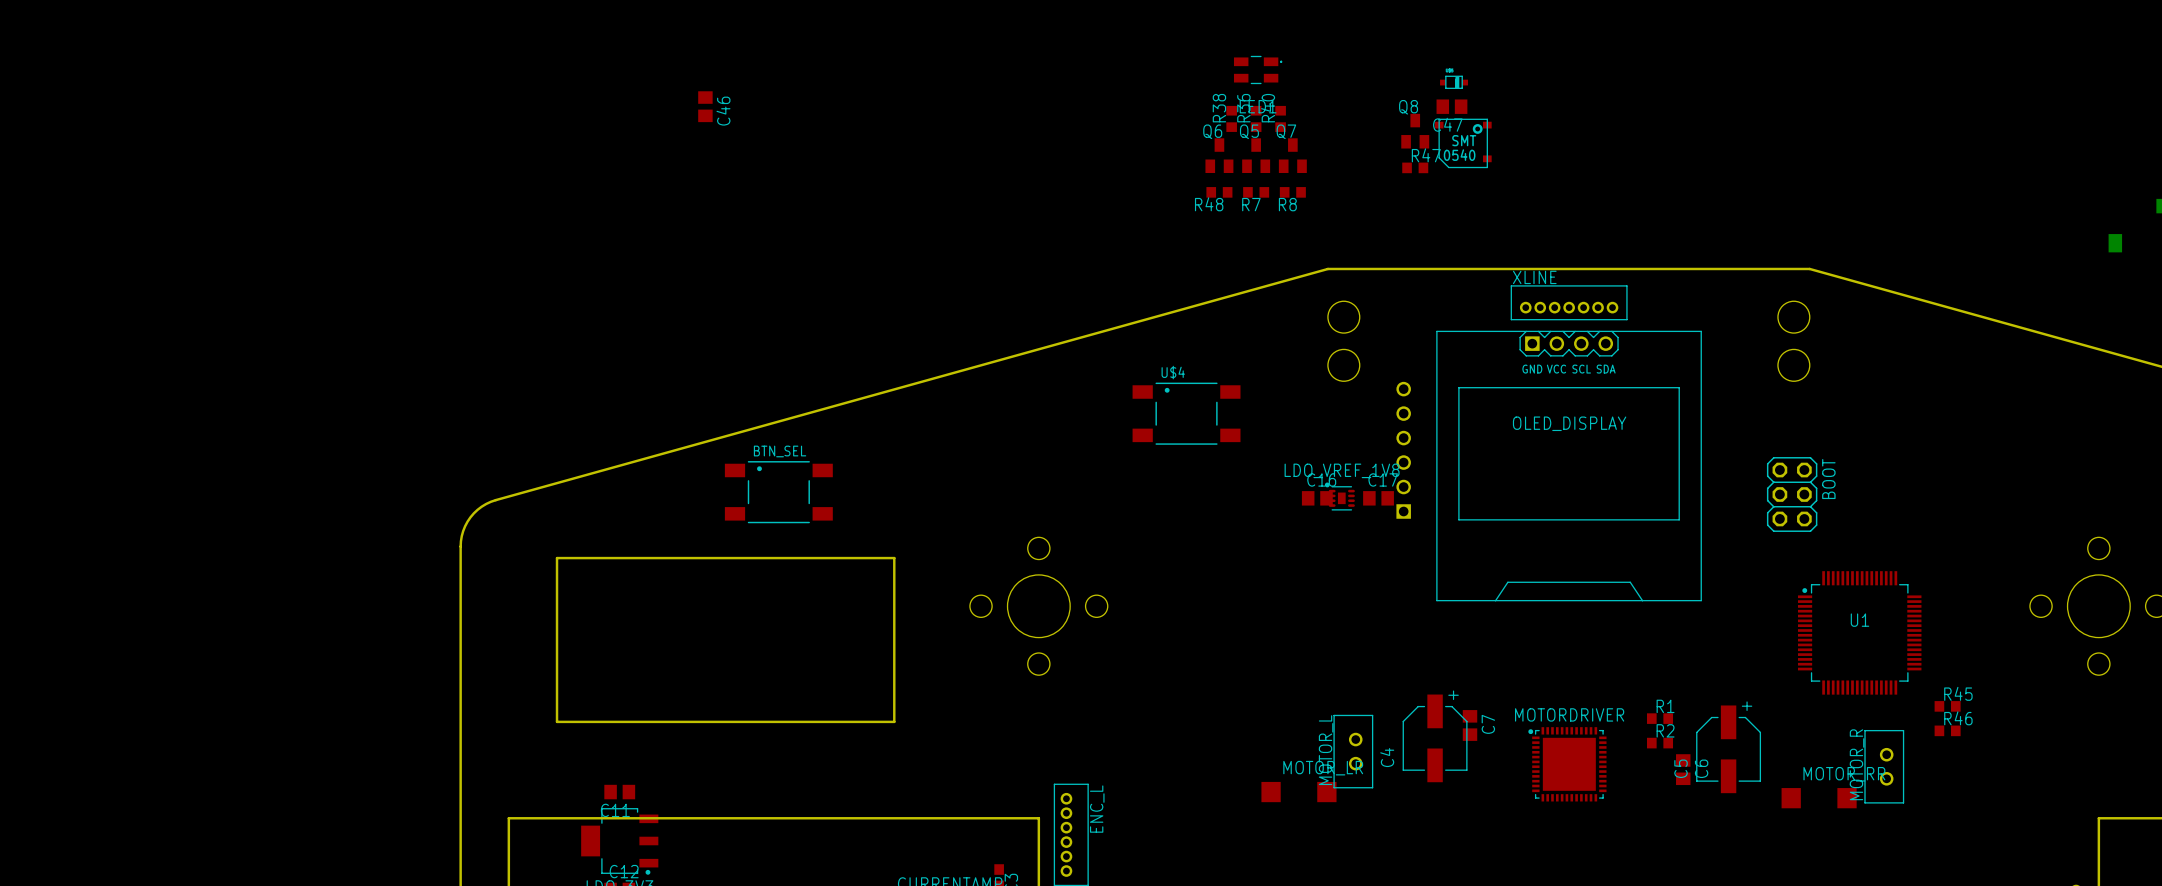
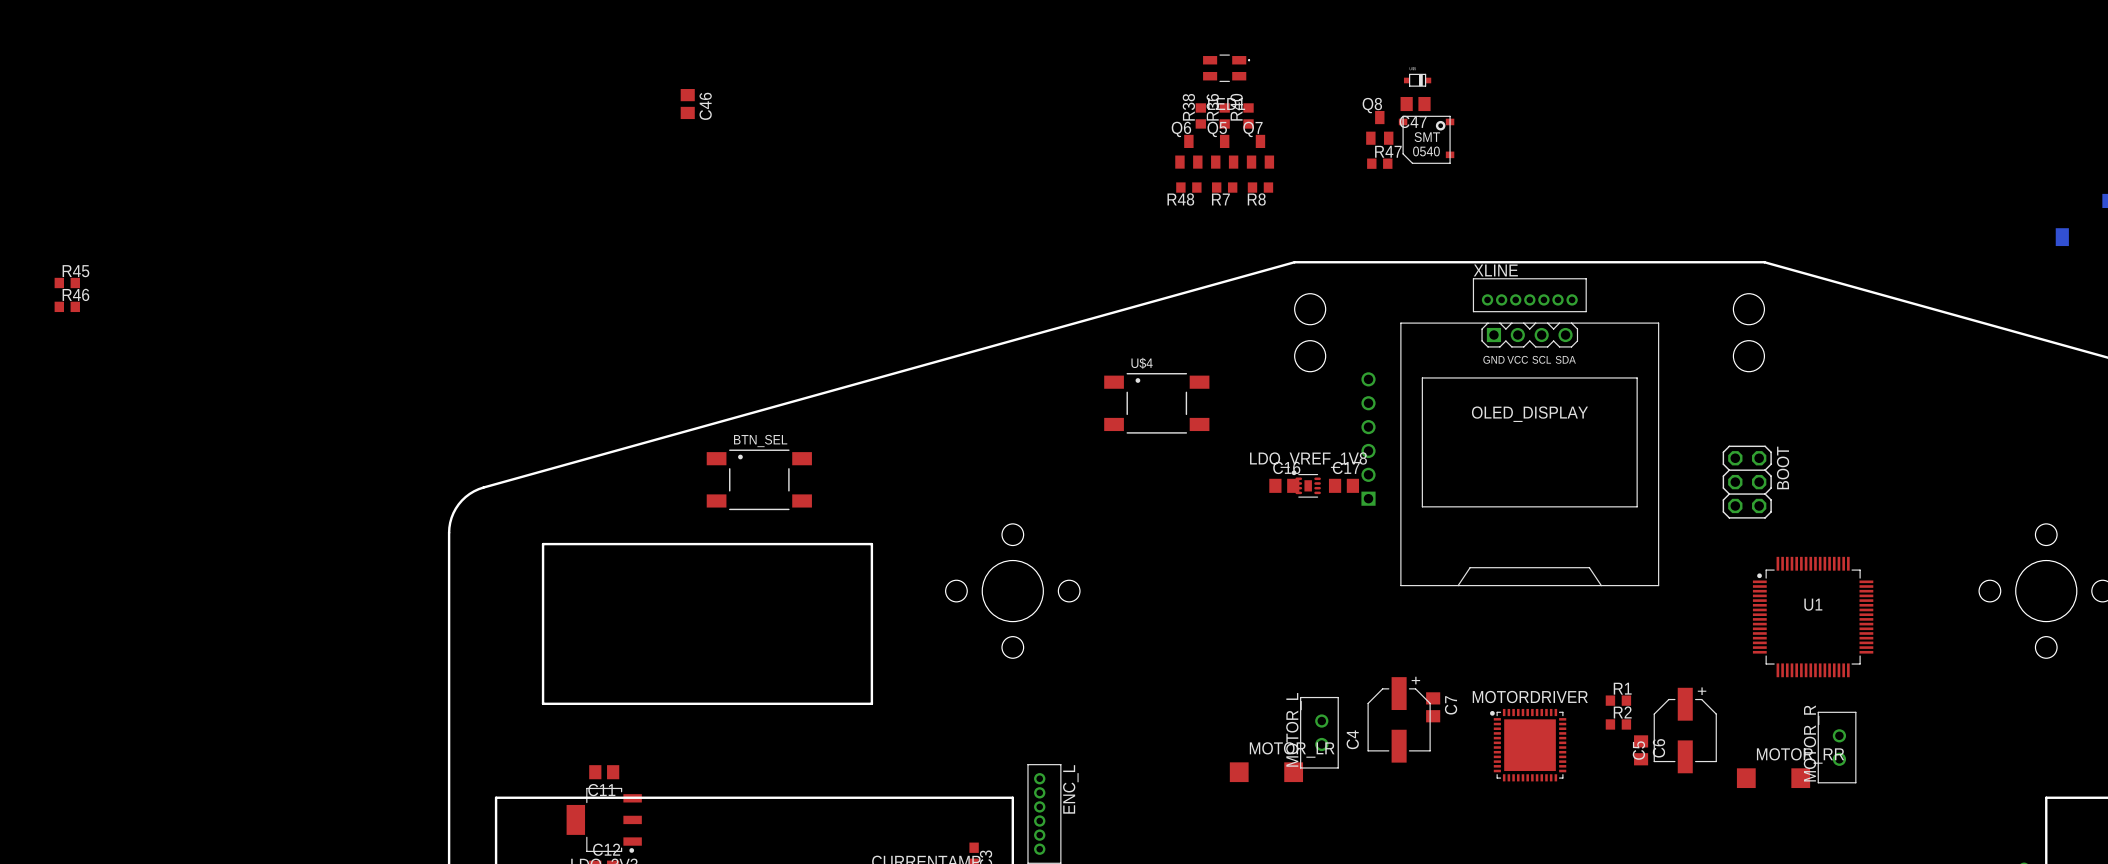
R45 position: (1947, 706) -> (67, 283)
R46 position: (1947, 730) -> (67, 306)

